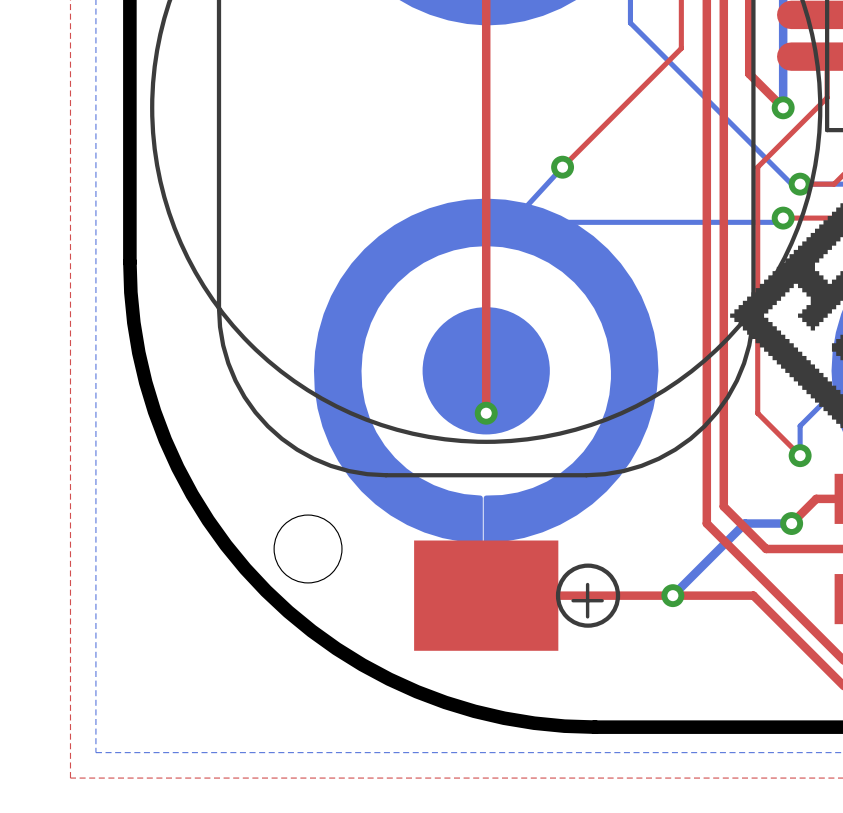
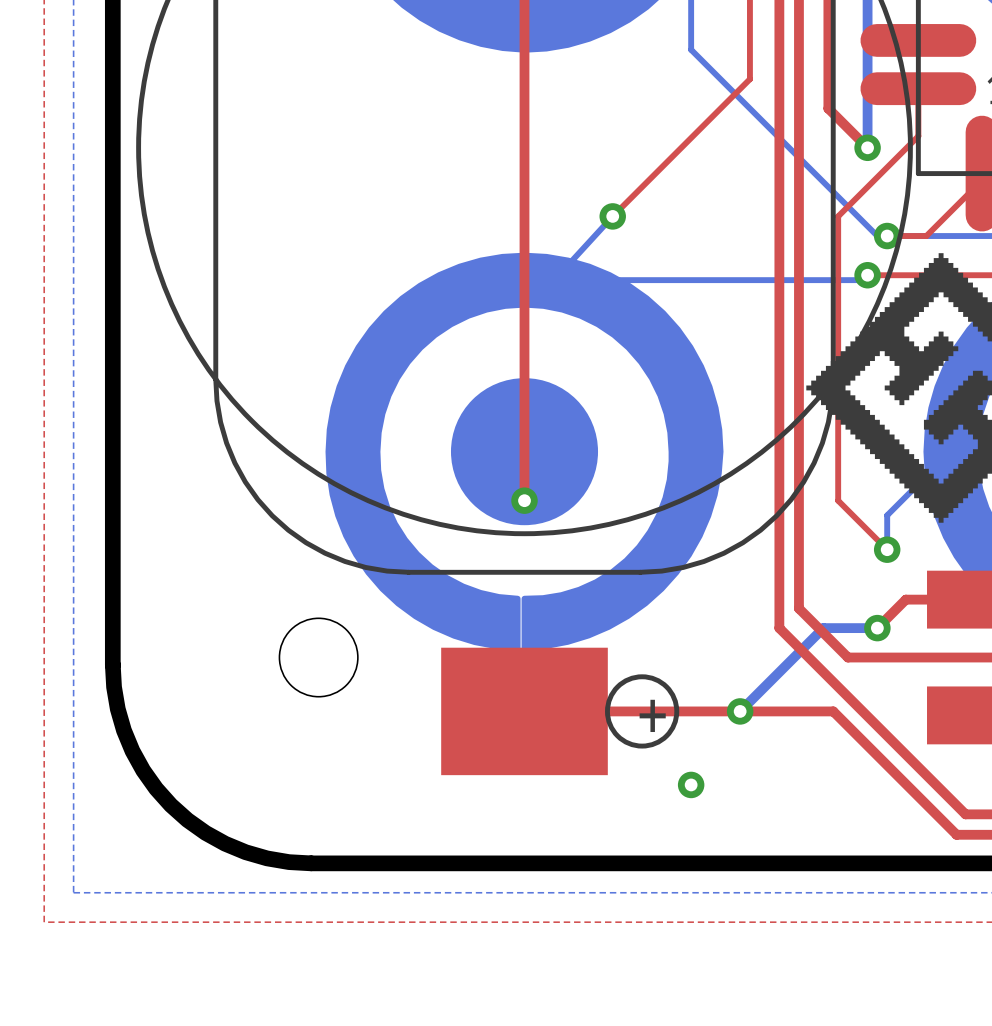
board edge: (129, 262) (133, 322) (138, 352) (154, 411) (165, 440) (177, 467) (208, 520) (245, 568) (266, 590) (288, 611) (336, 648) (389, 679) (416, 691) (445, 702) (504, 718) (534, 723) (594, 727) -> (112, 326) (114, 687) (117, 709) (132, 751) (143, 770) (170, 805) (205, 832) (225, 843) (267, 858) (289, 862) (650, 863)
via: none -> (691, 784)

